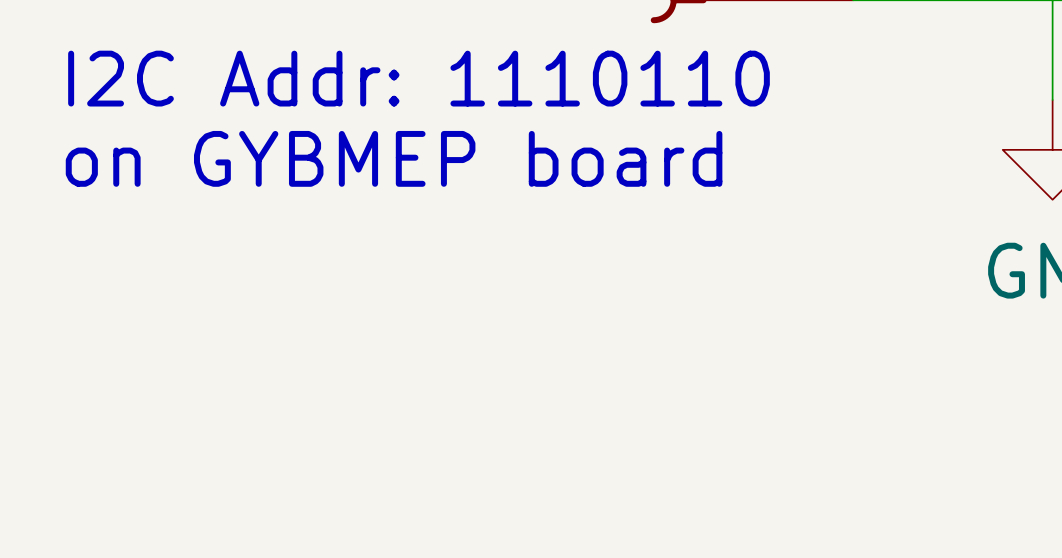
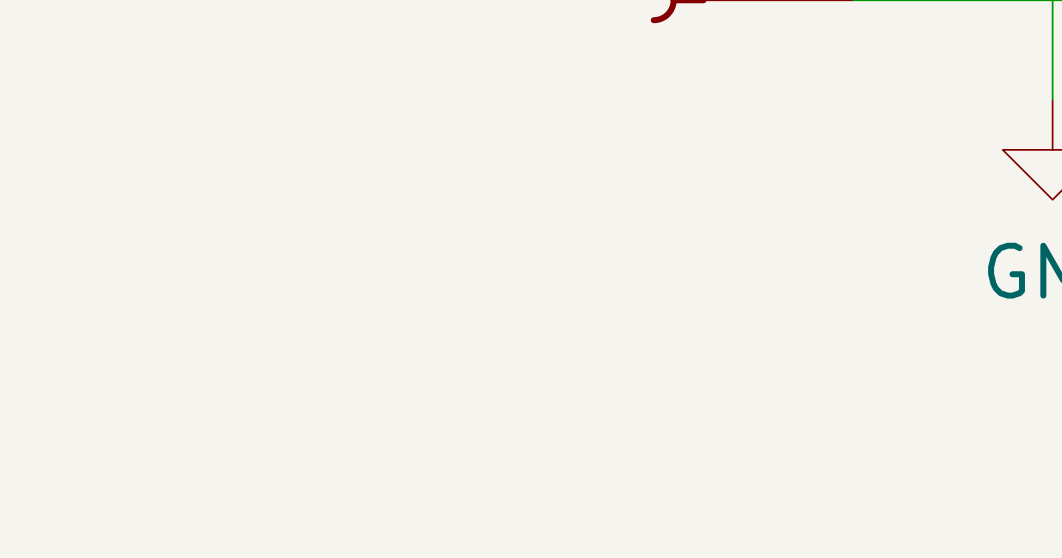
text: I2C Addr: 1110110 (419, 78) -> none
text: on GYBMEP board (394, 158) -> none

